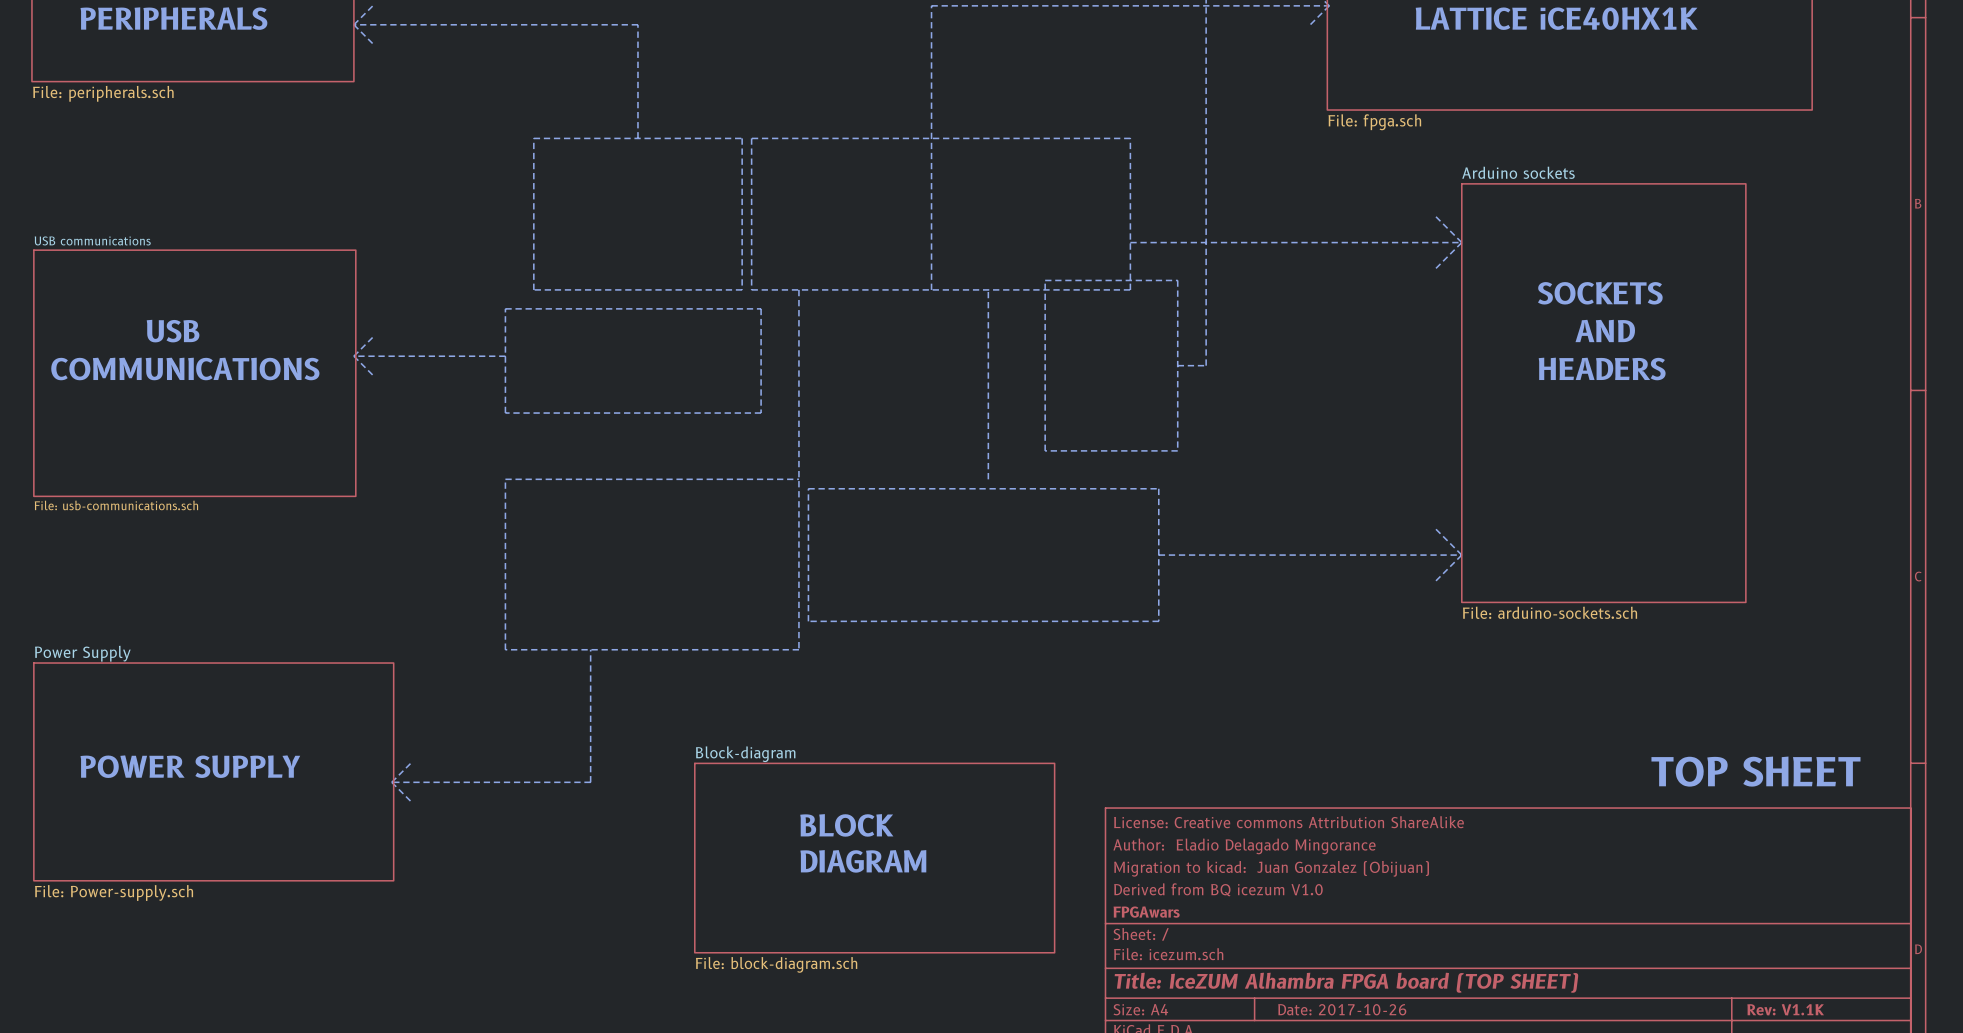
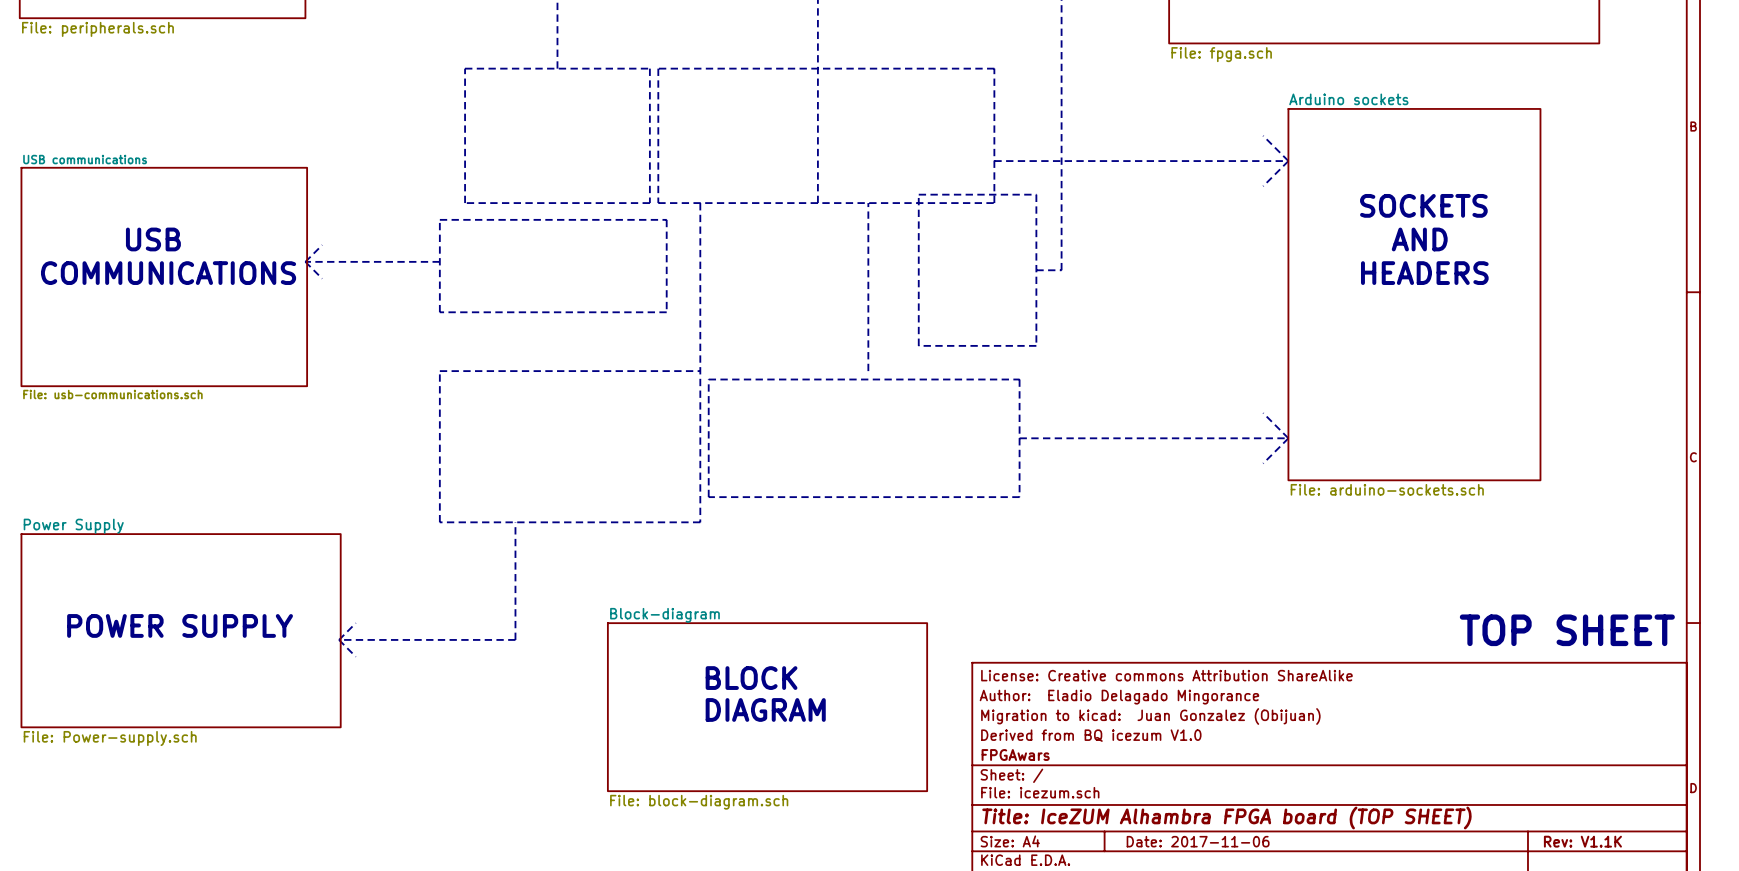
title block: Date: 2017-10-26 (1342, 1009) -> Date: 2017-11-06 (1198, 841)

